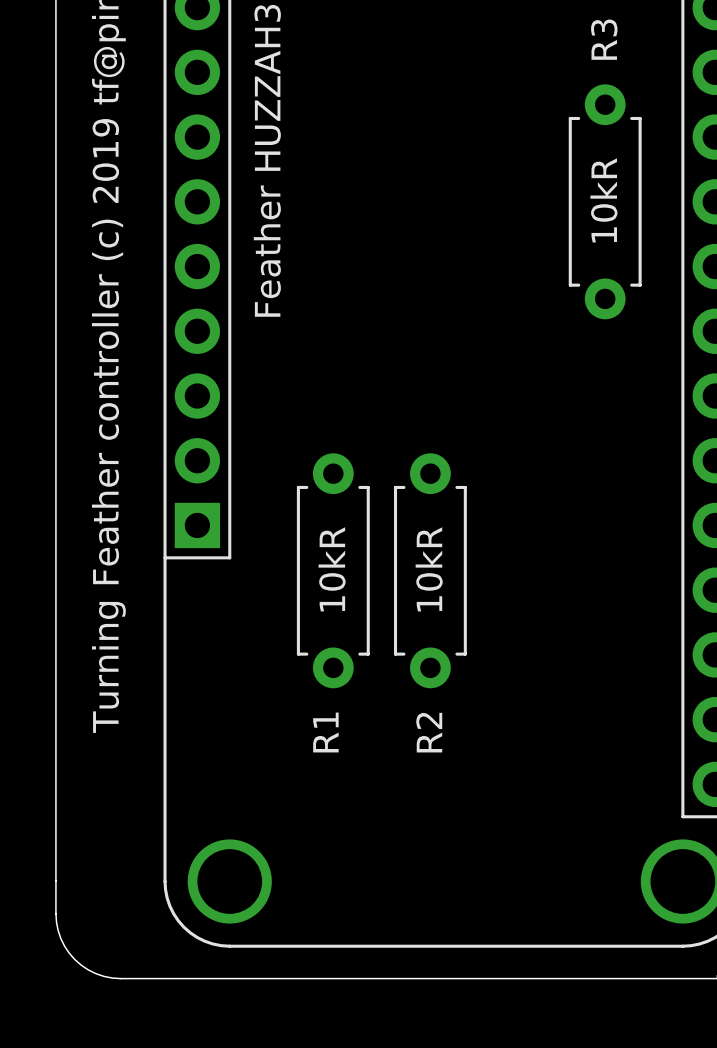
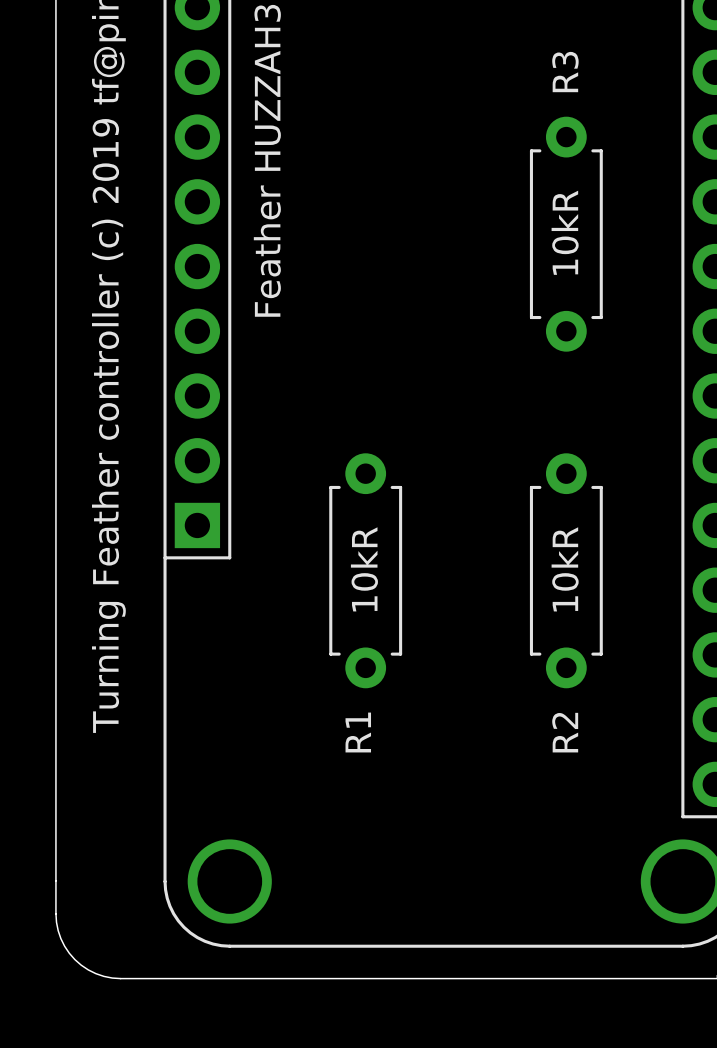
R3 position: (605, 201) -> (566, 234)
R1 position: (333, 570) -> (365, 570)
R2 position: (430, 570) -> (566, 570)

